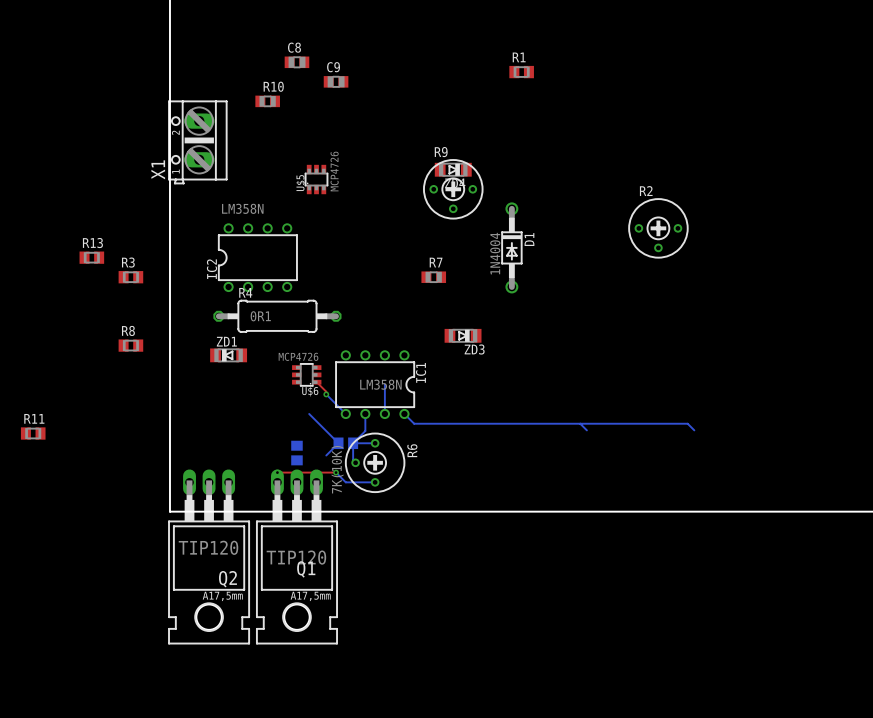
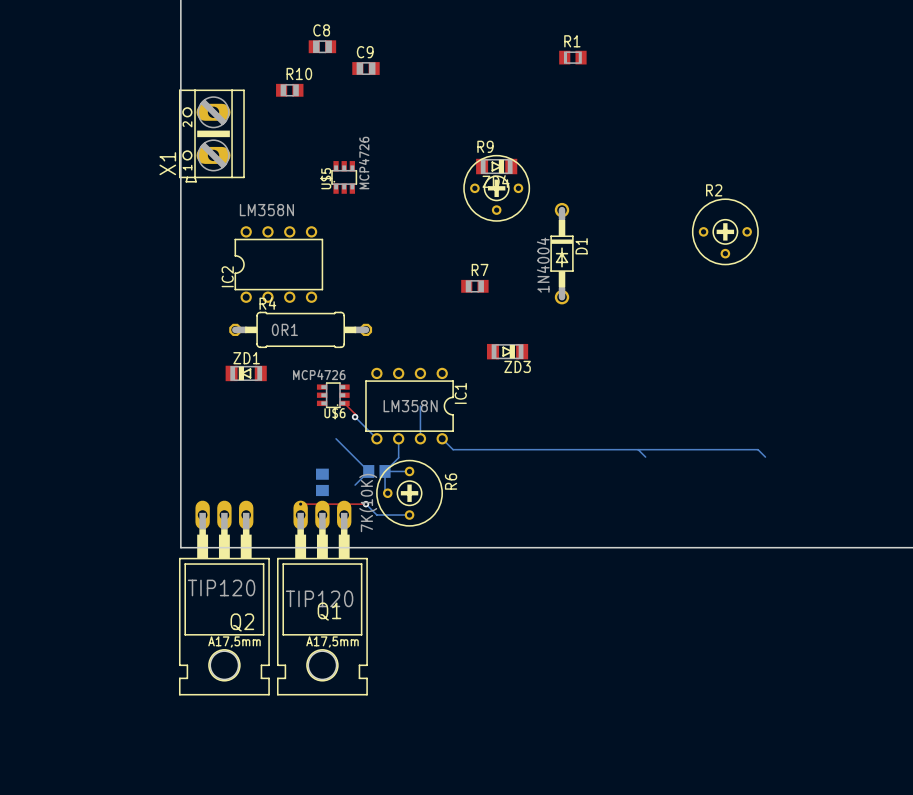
R13: (91, 257) -> none
R3: (130, 277) -> none
R8: (130, 345) -> none
R11: (33, 433) -> none

